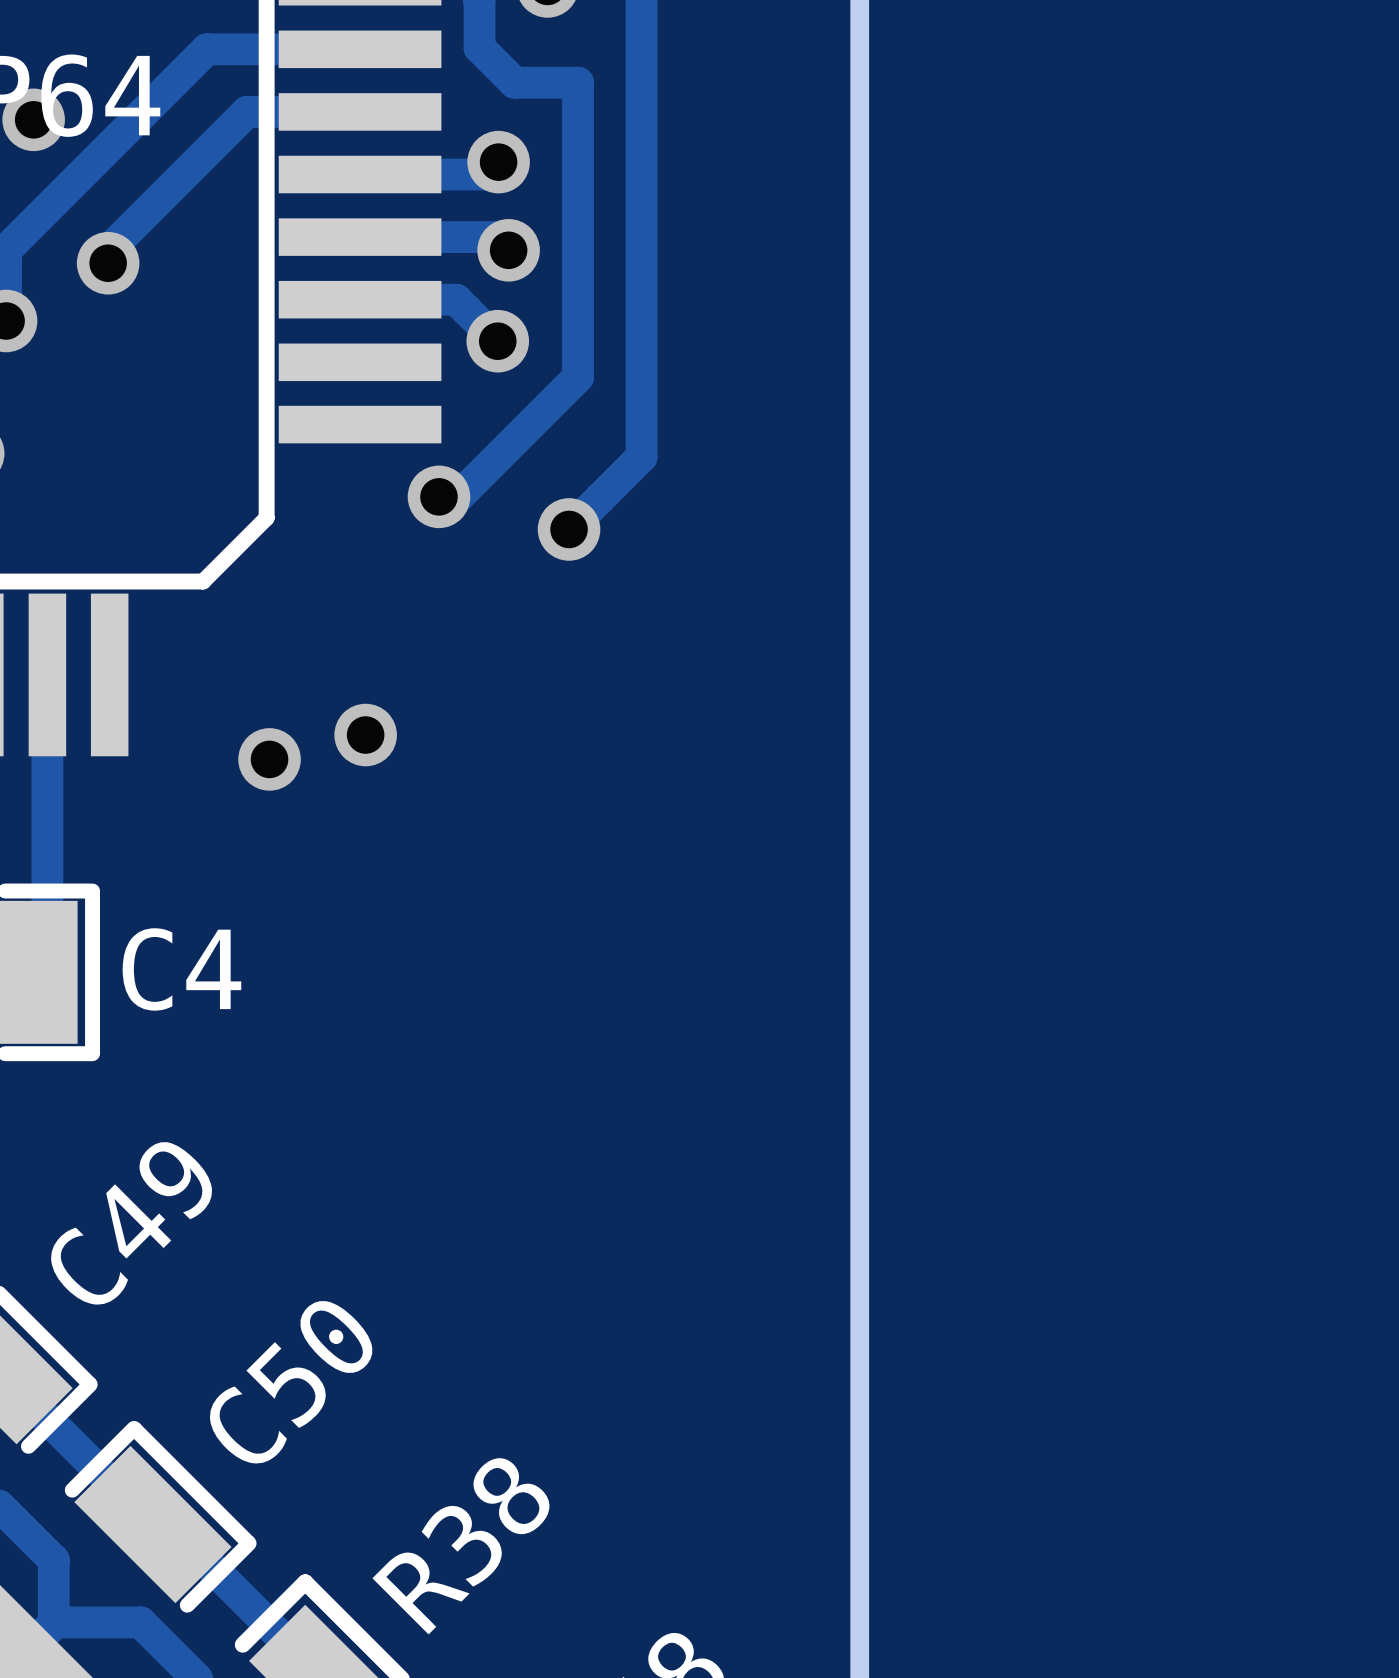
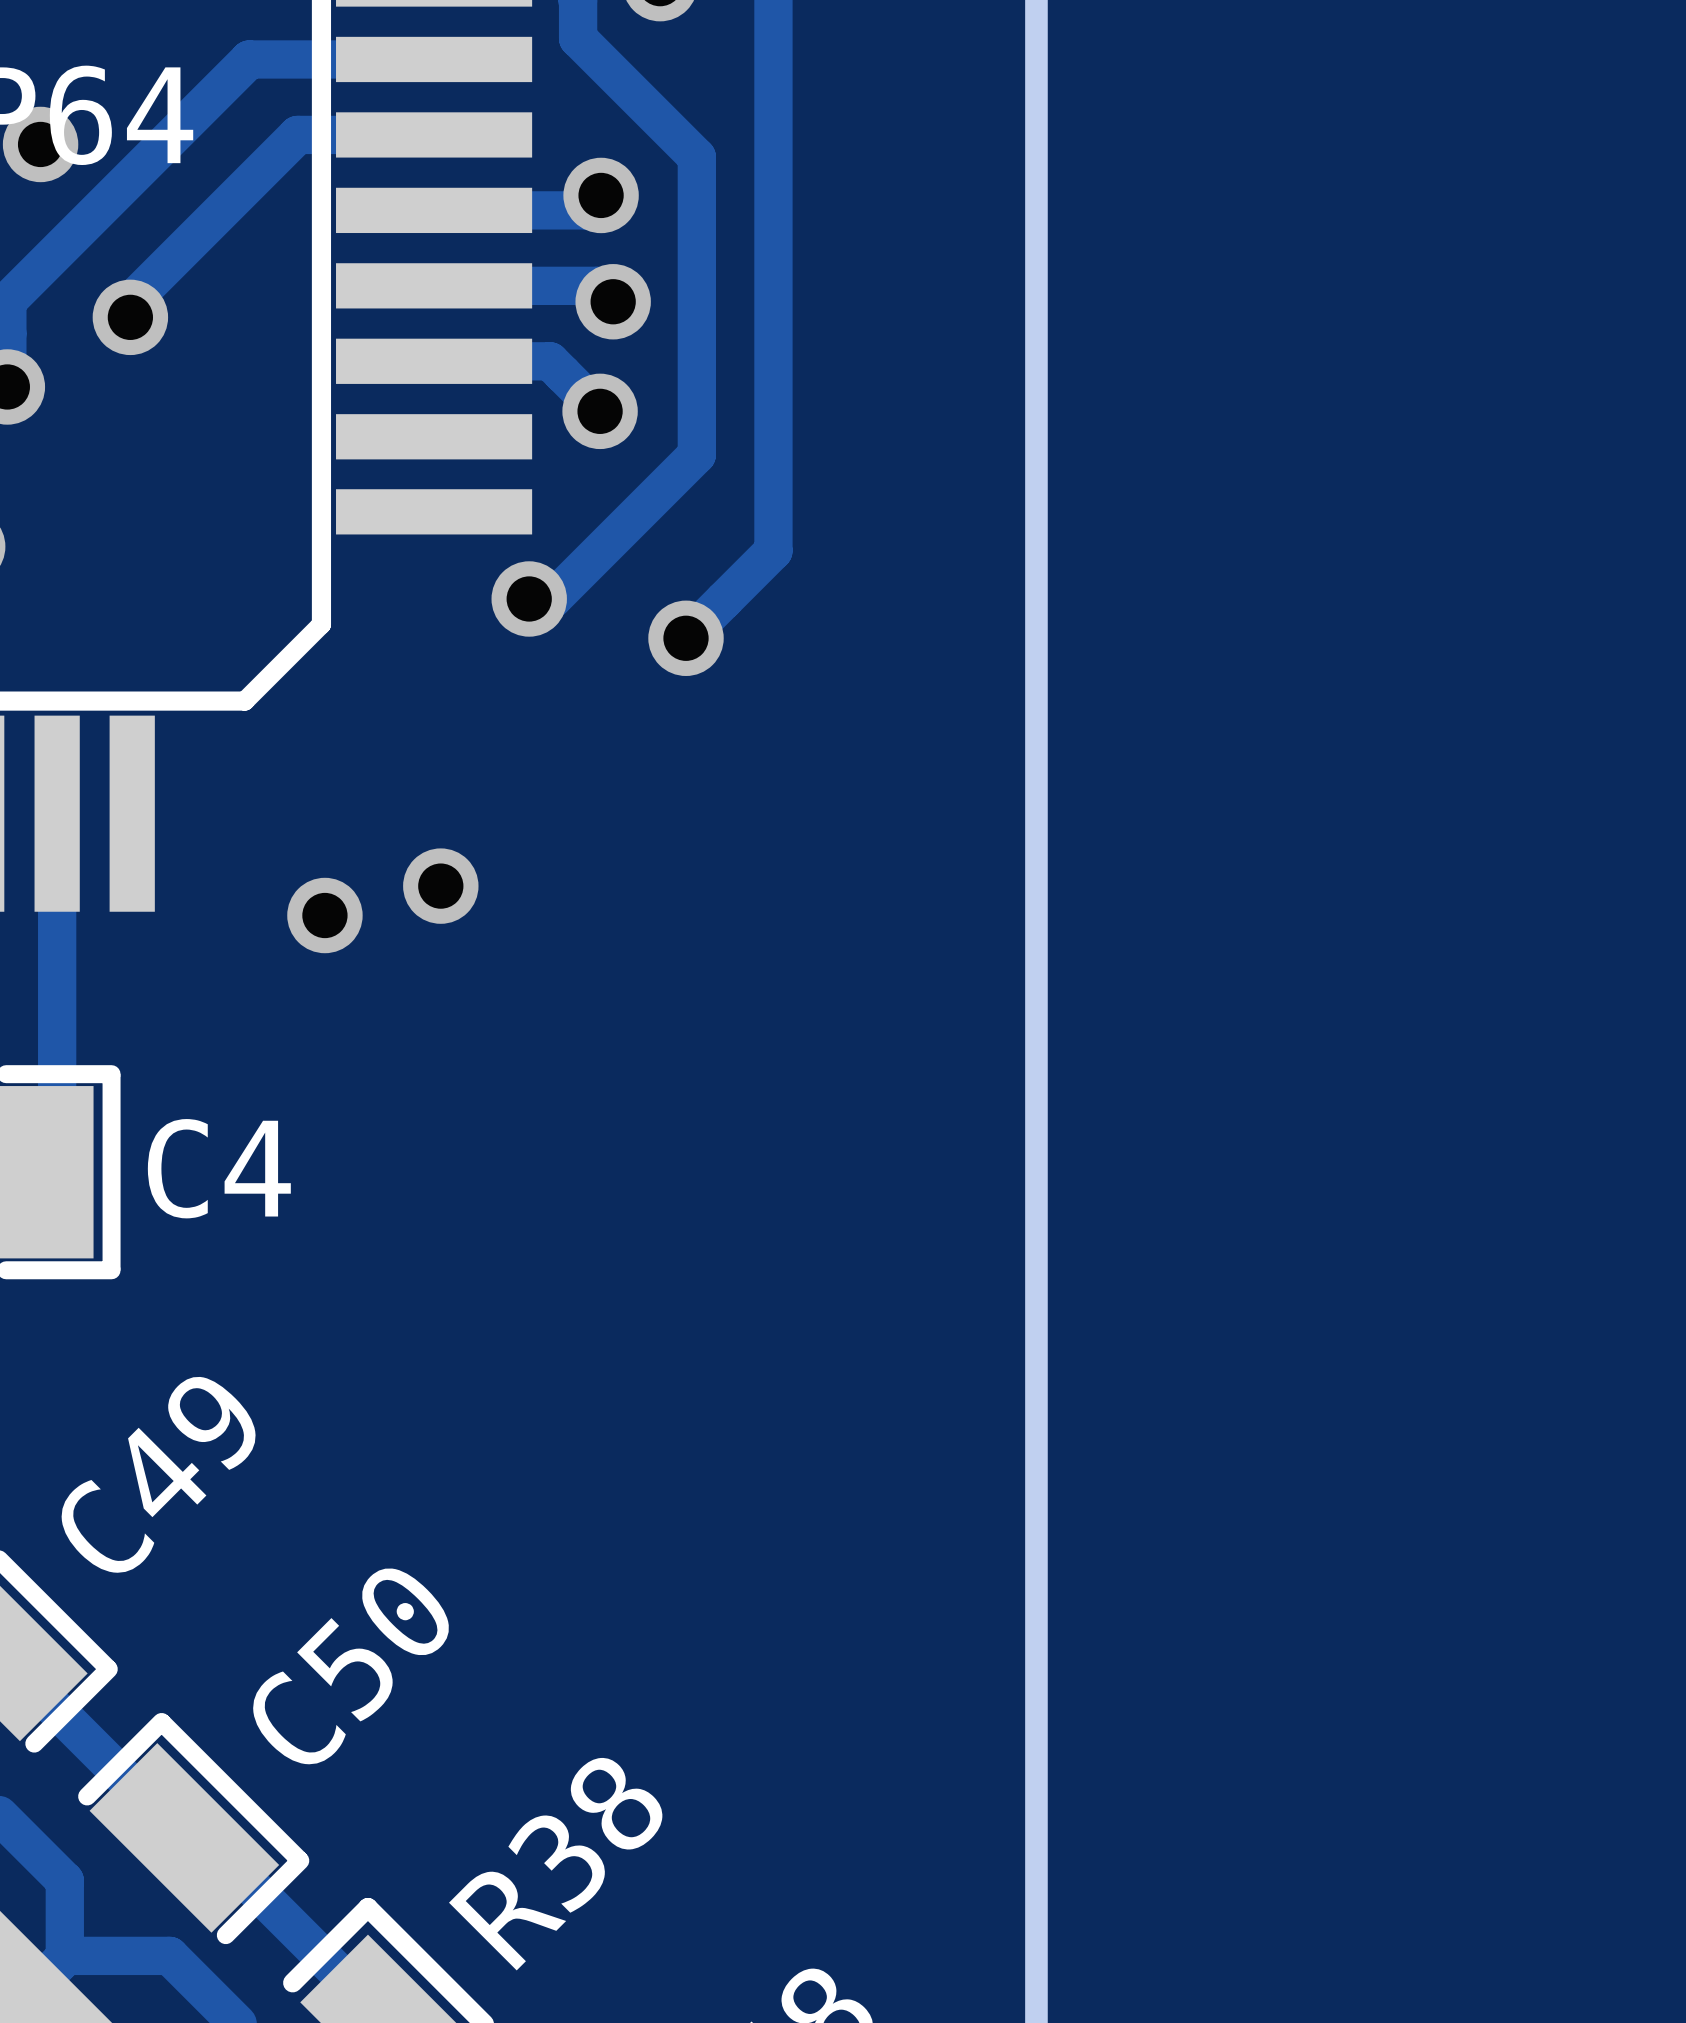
track: (479, 31) (479, 47) (514, 82) (578, 82) (578, 130) -> (578, 38) (696, 157)

